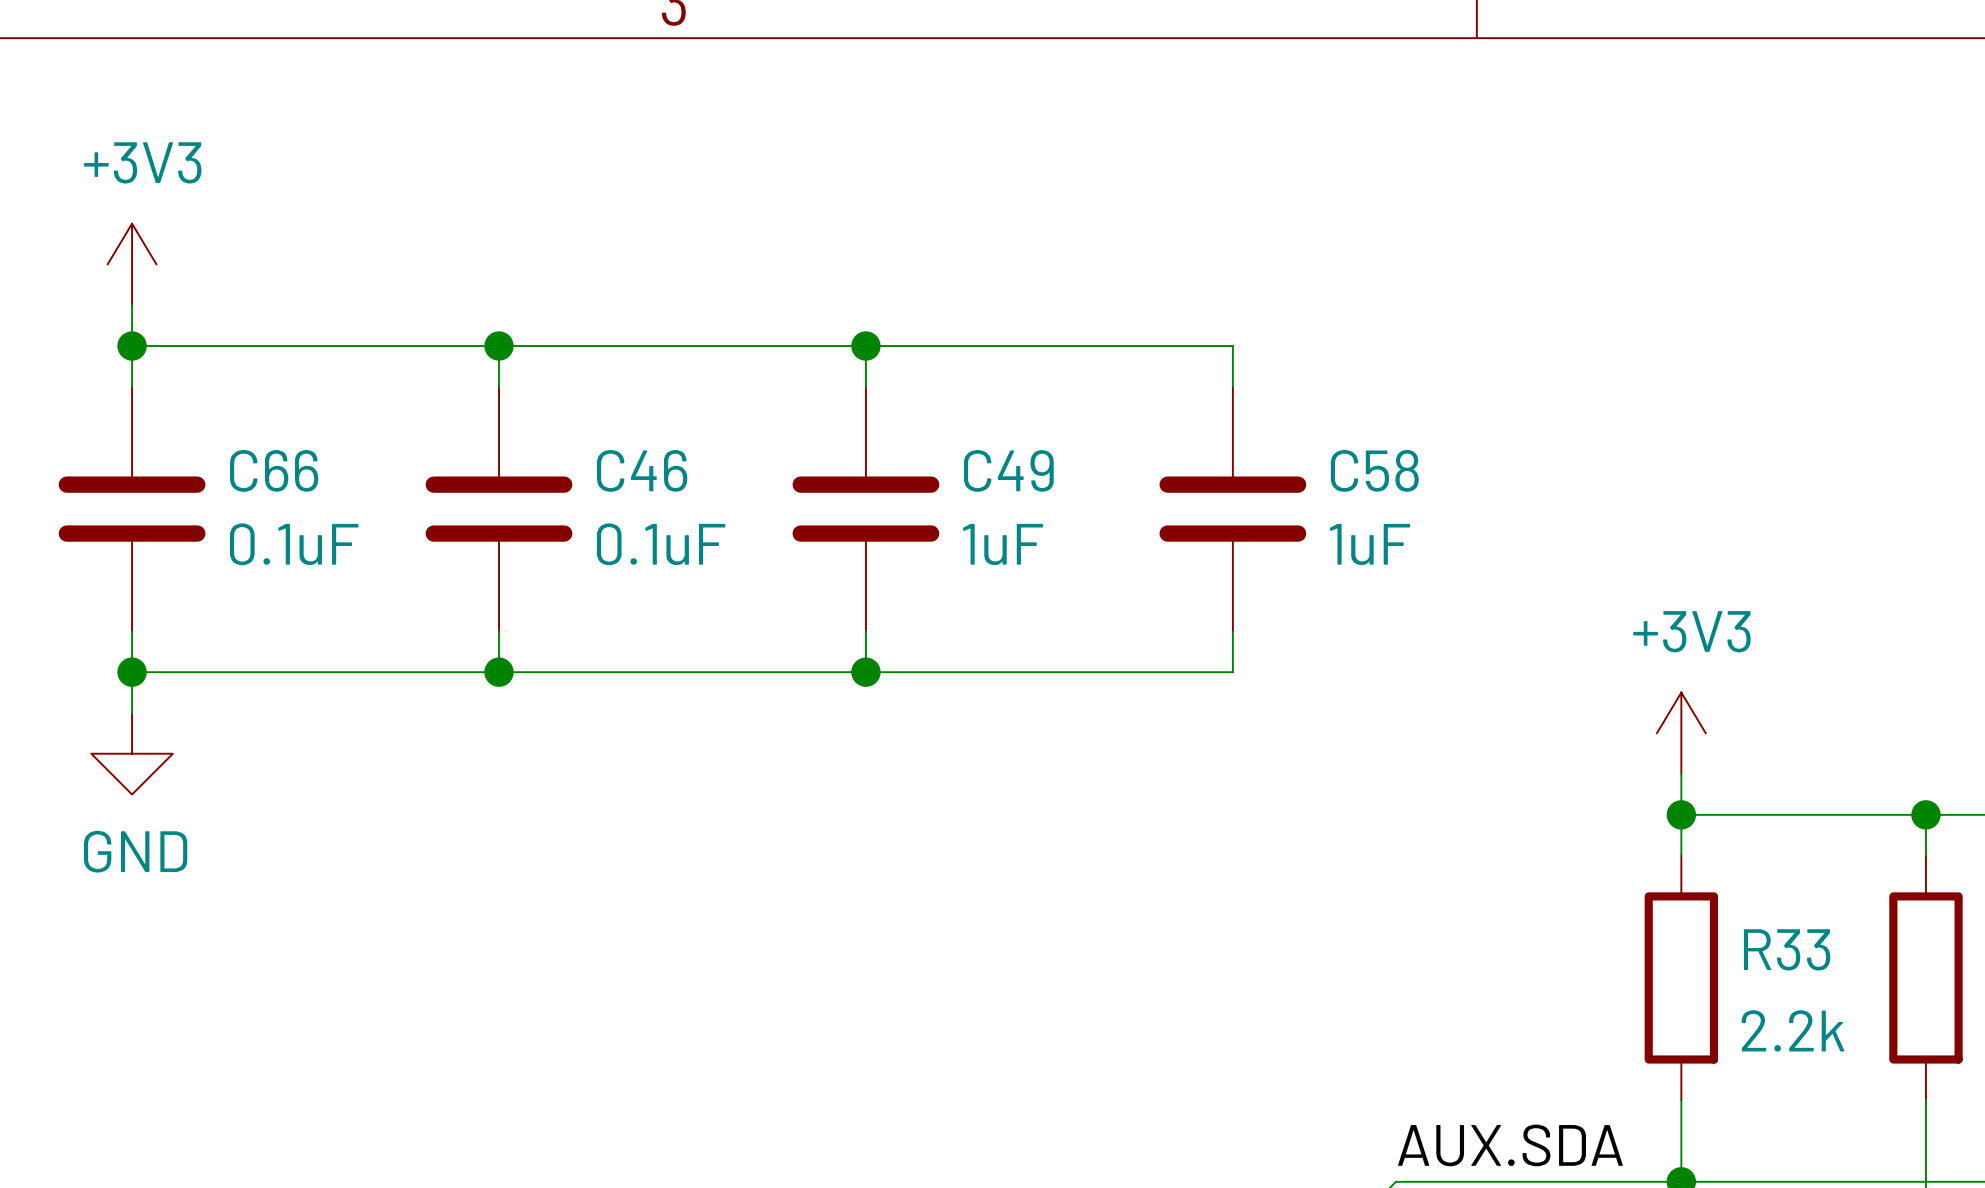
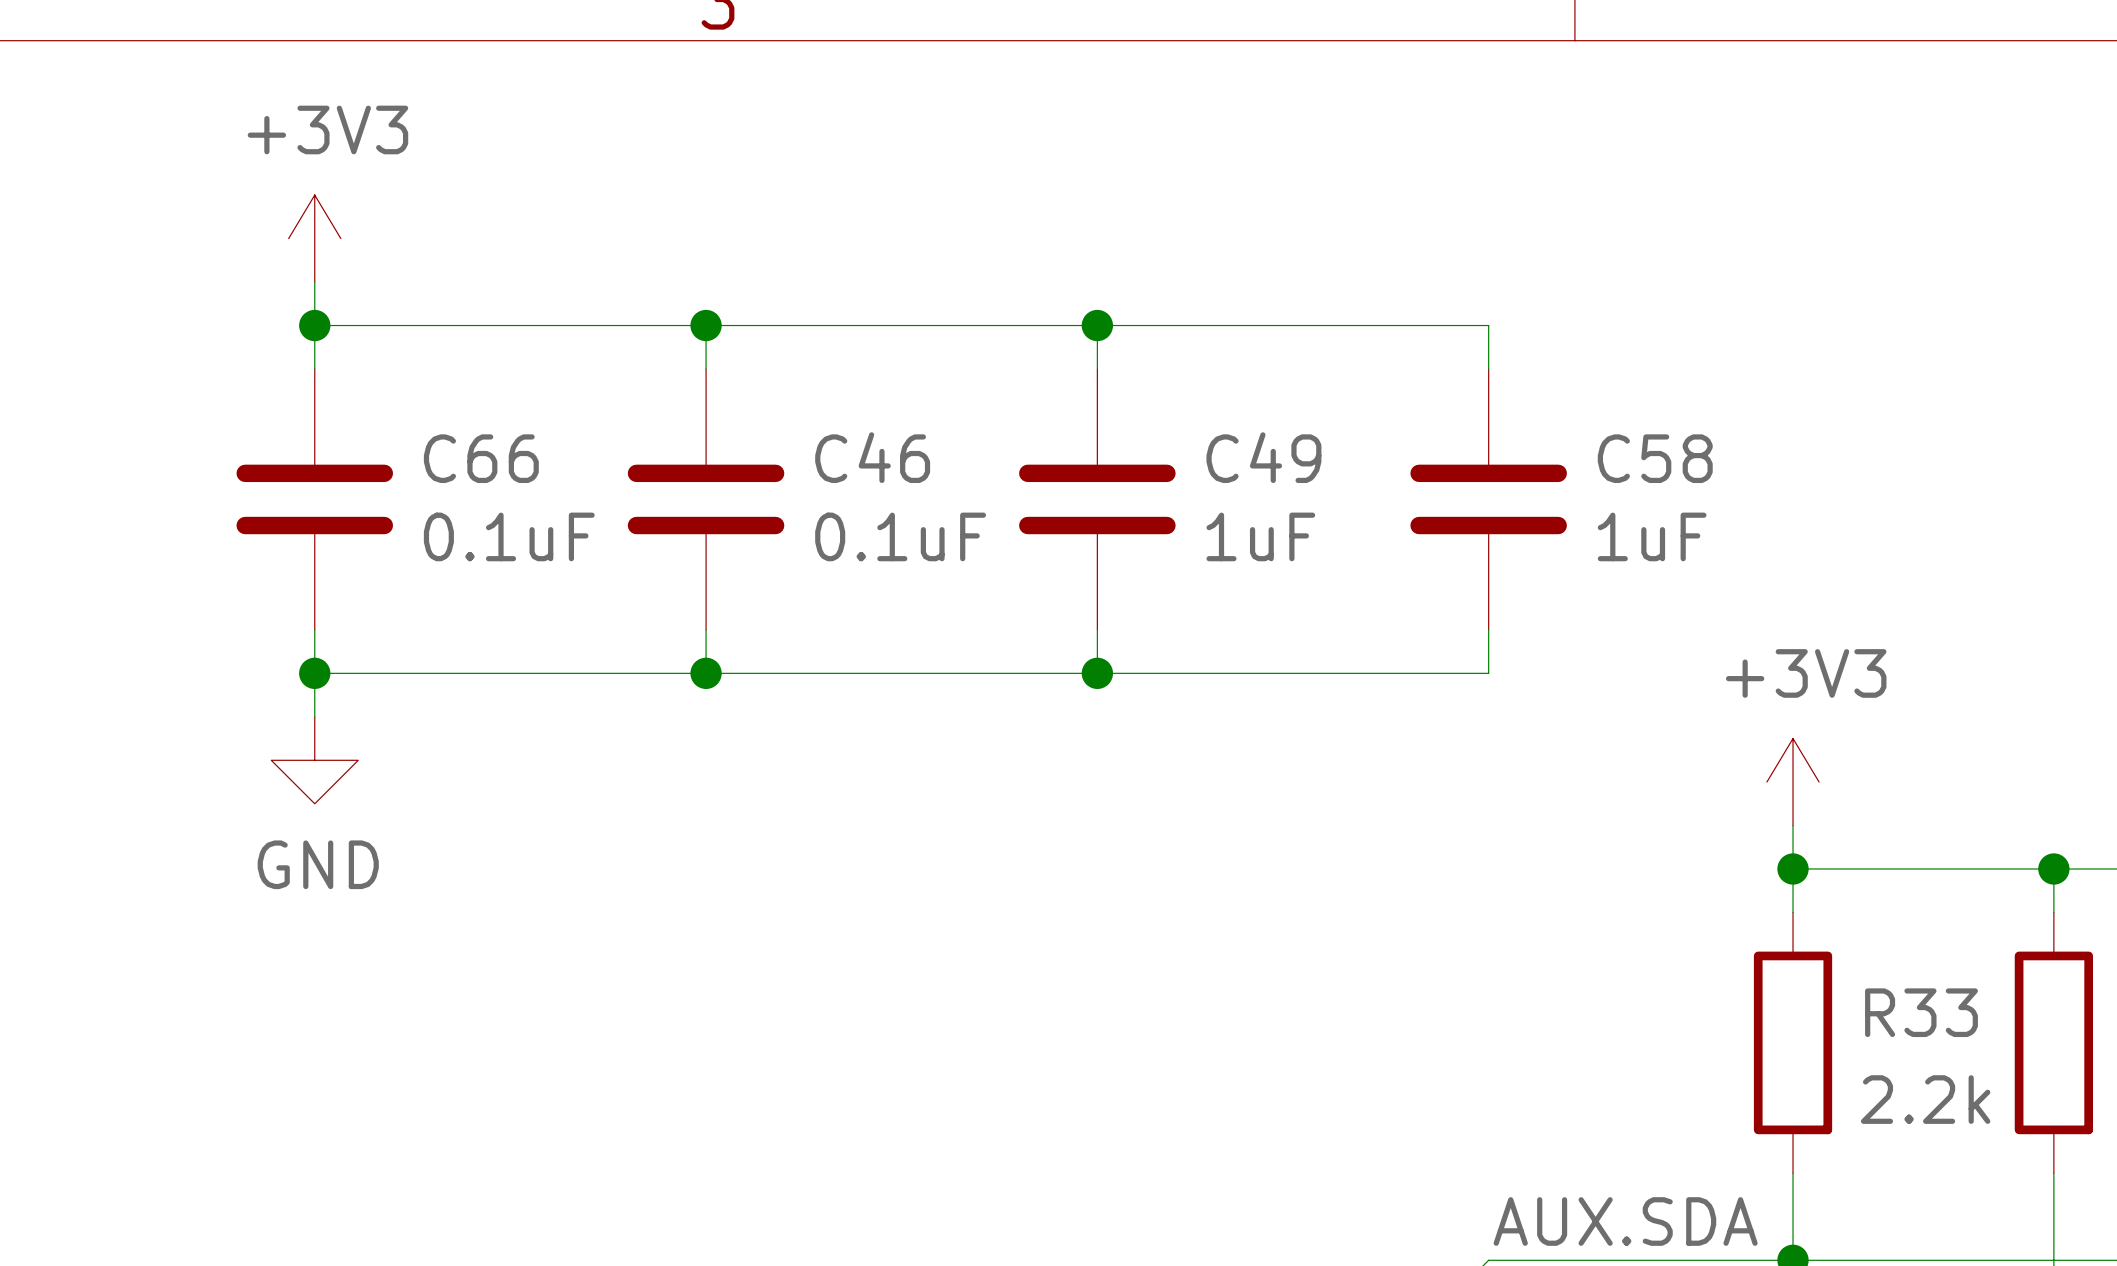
power symbol position: +3V3 (132, 264) -> +3V3 (314, 238)
wire: (132, 305) (132, 386) -> (314, 282) (314, 369)
junction: none -> (314, 325)
junction: none -> (706, 325)
junction: none -> (1097, 325)
wire: (132, 346) (1232, 346) (1232, 386) -> (314, 325) (1488, 325) (1488, 369)
junction: (132, 346) -> none
wire: (499, 346) (499, 386) -> (706, 325) (706, 369)
junction: (499, 346) -> none
wire: (865, 346) (865, 386) -> (1097, 325) (1097, 369)
junction: (865, 346) -> none
C66 position: (132, 509) -> (314, 499)
C46 position: (499, 509) -> (706, 499)
C49 position: (865, 509) -> (1097, 499)
C58 position: (1232, 509) -> (1488, 499)
wire: (132, 631) (132, 712) -> (314, 629) (314, 716)
junction: none -> (314, 673)
wire: (499, 631) (499, 672) -> (706, 629) (706, 673)
junction: none -> (706, 673)
wire: (865, 631) (865, 672) -> (1097, 629) (1097, 673)
junction: none -> (1097, 673)
wire: (1232, 631) (1232, 672) (132, 672) -> (1488, 629) (1488, 673) (314, 673)
junction: (132, 672) -> none
junction: (499, 672) -> none
junction: (865, 672) -> none
power symbol position: GND (132, 753) -> GND (314, 760)

